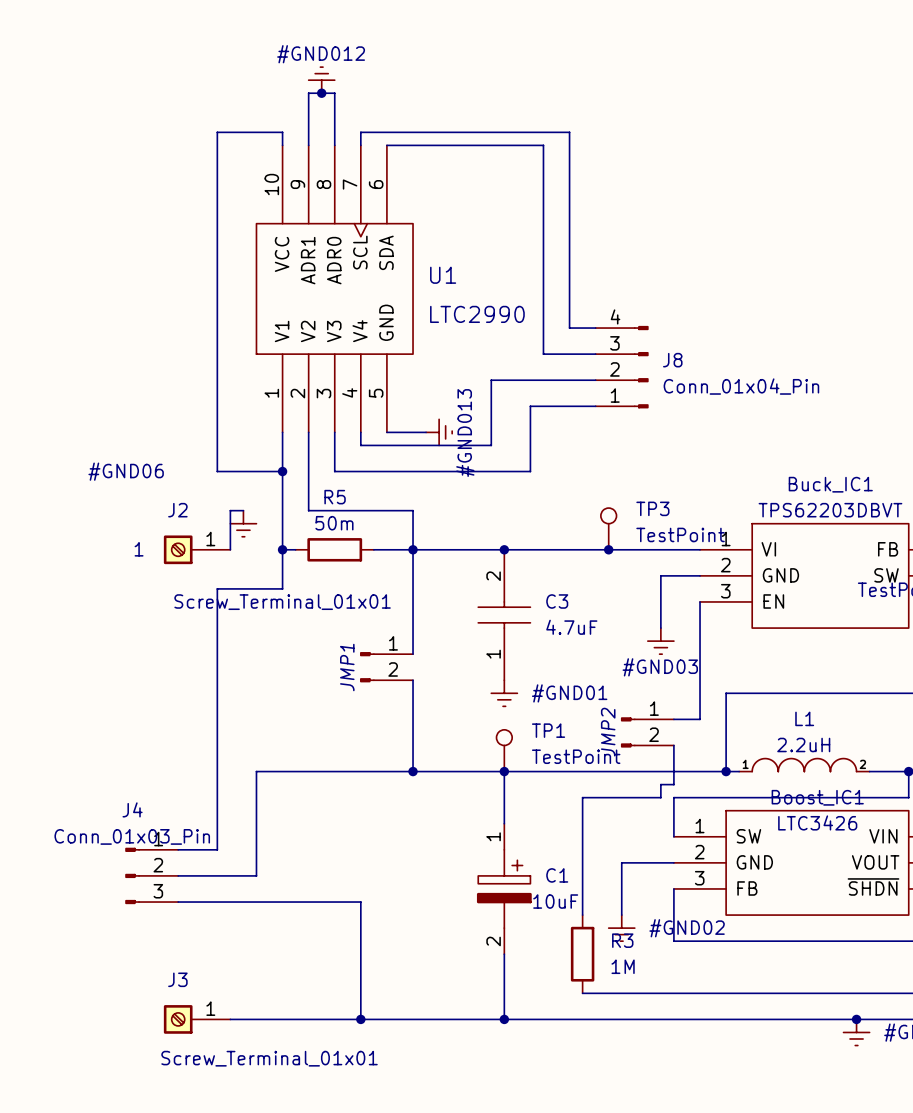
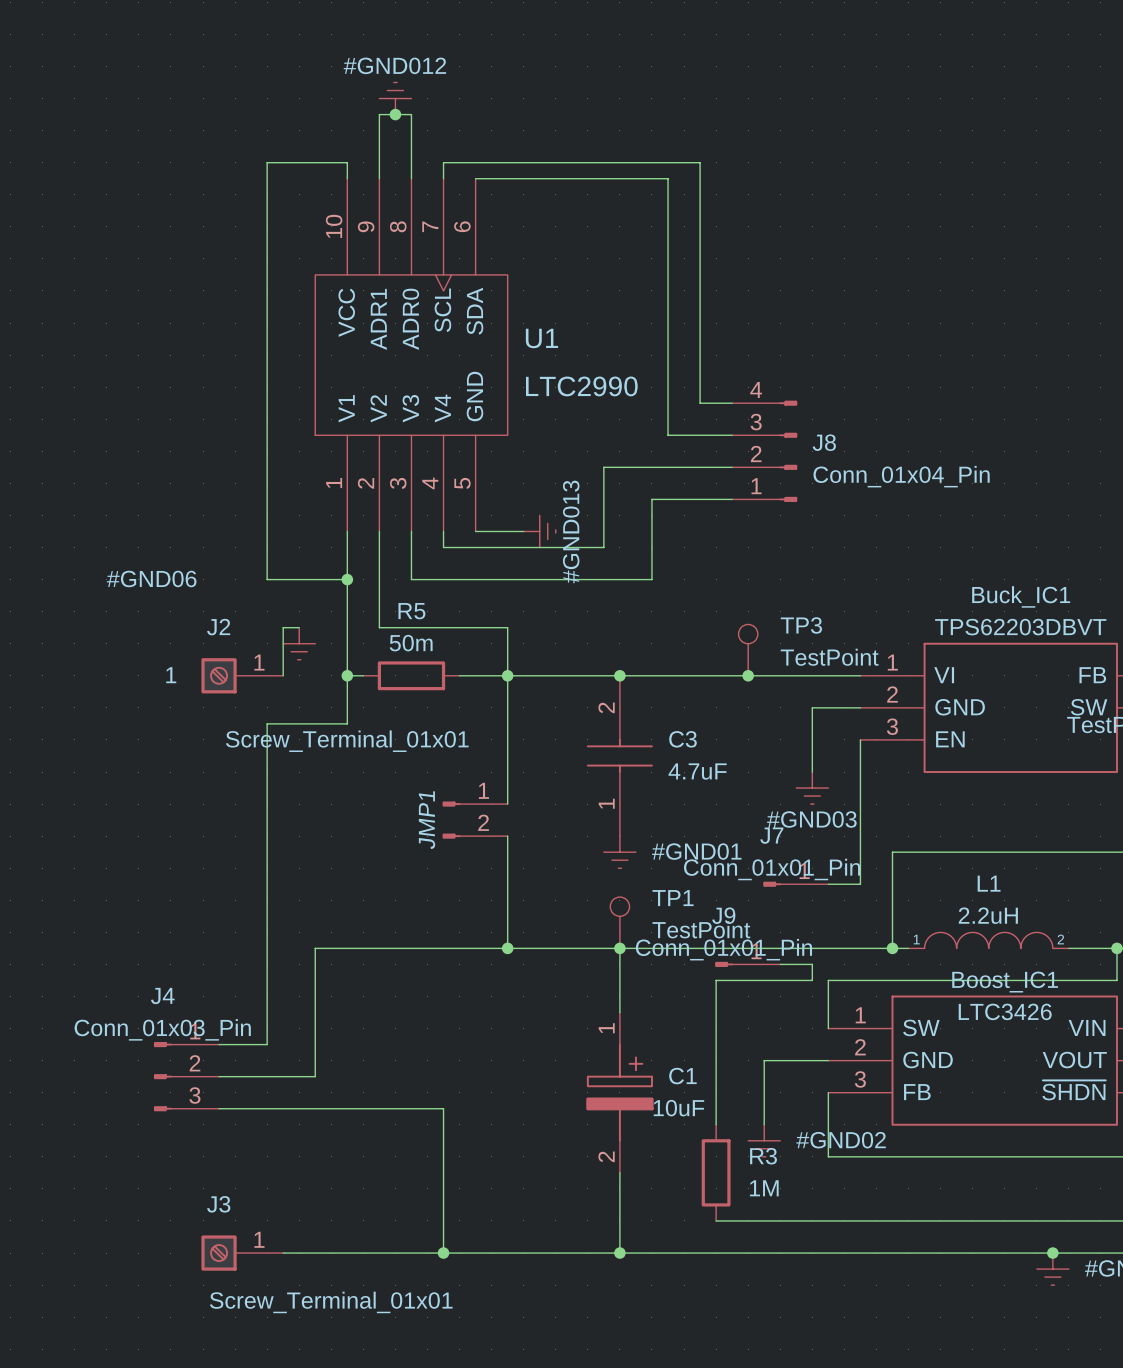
J7: none -> Conn_01x01_Pin (795, 884)
JMP2: (647, 732) -> none
wire: (673, 745) (673, 784) (660, 784) -> (780, 964) (812, 964)
J9: none -> Conn_01x01_Pin (747, 964)

